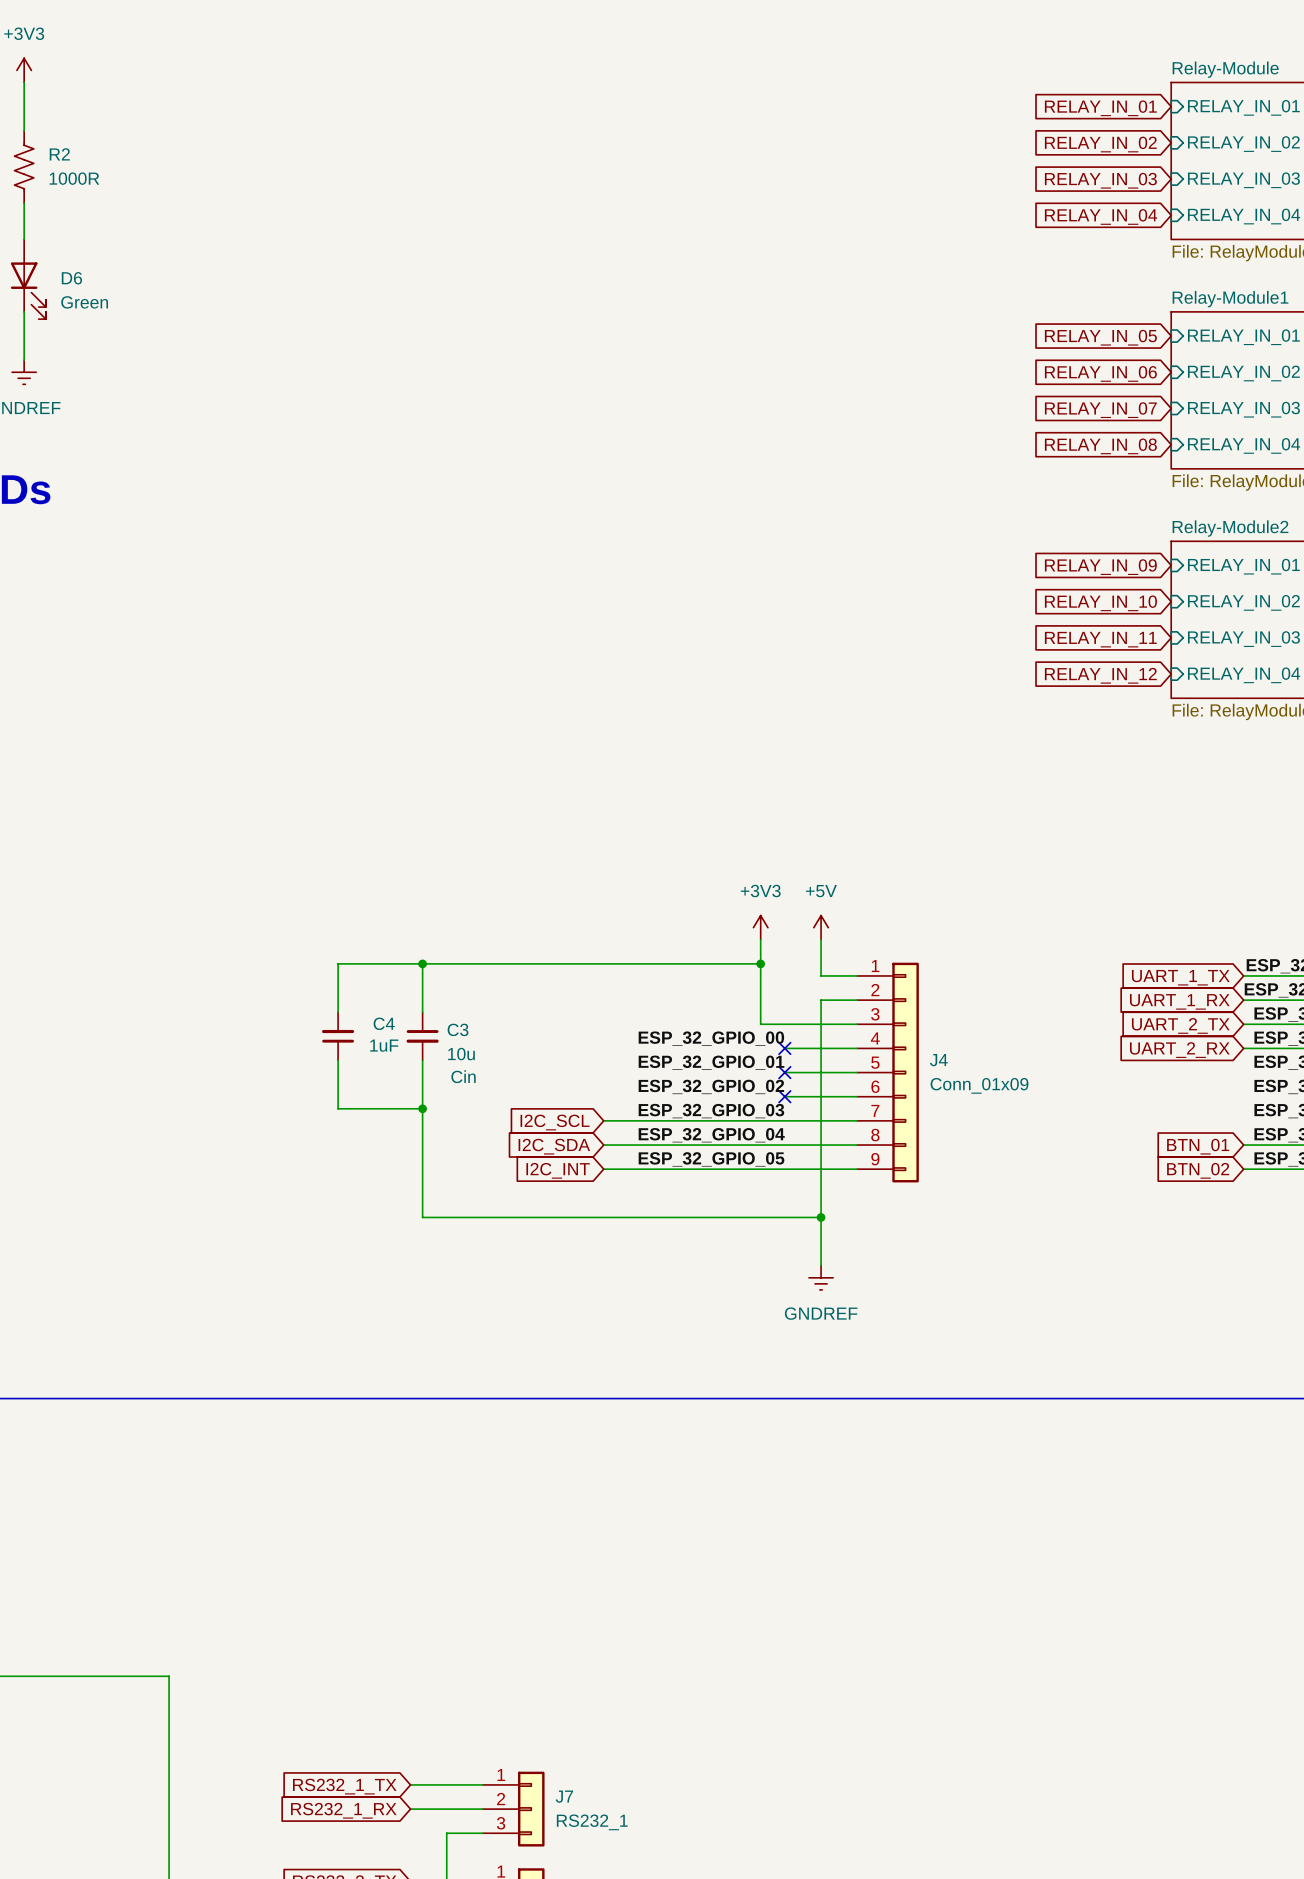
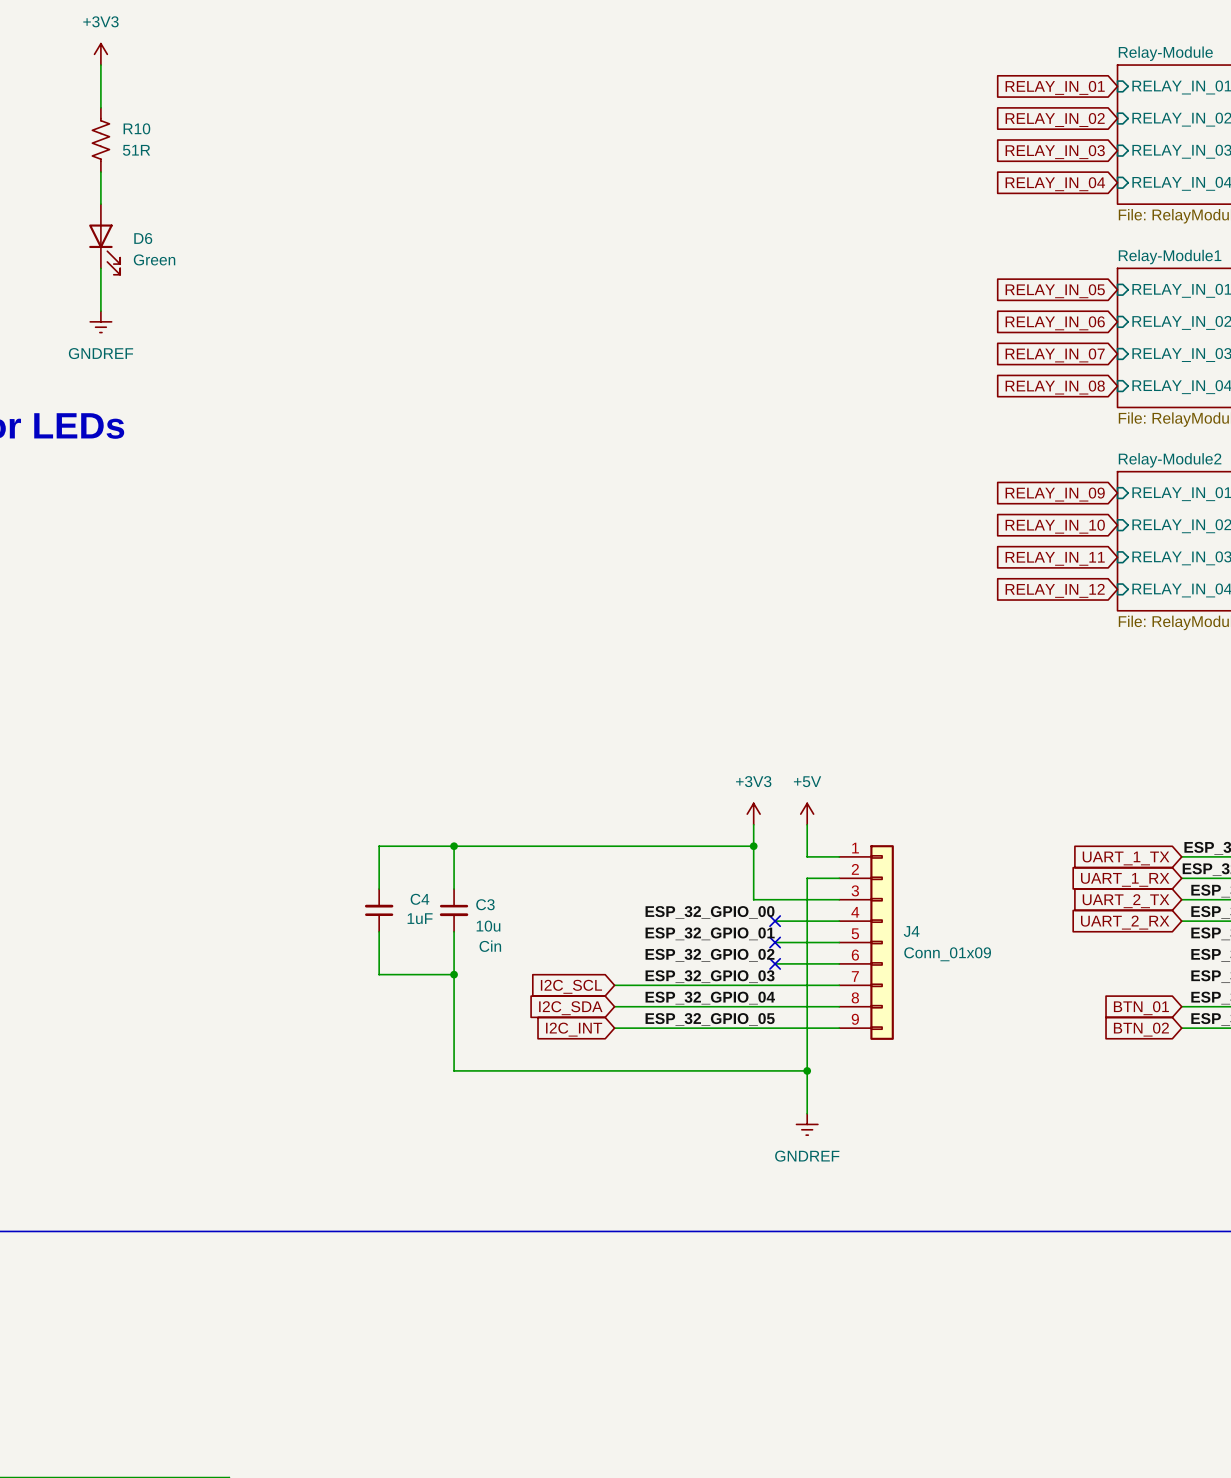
R2 name: R2 (59, 154) -> R10 (136, 128)
R2 value: 1000R (74, 178) -> 51R (136, 150)

